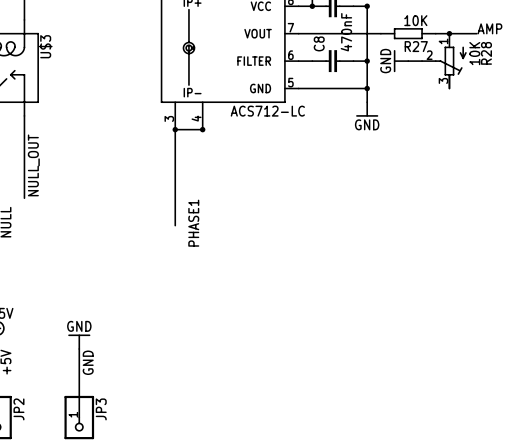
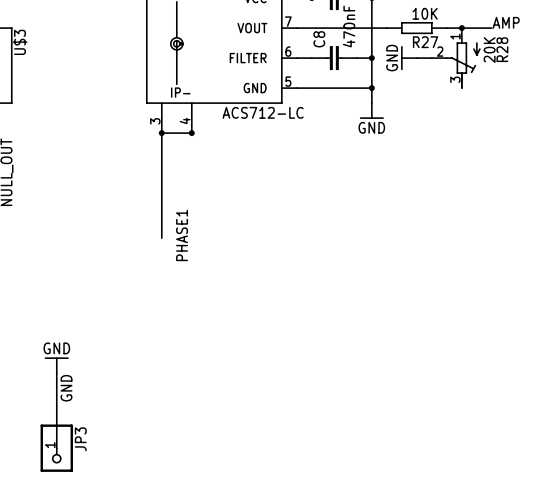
R28 value: 10K (474, 53) -> 20K (489, 50)

